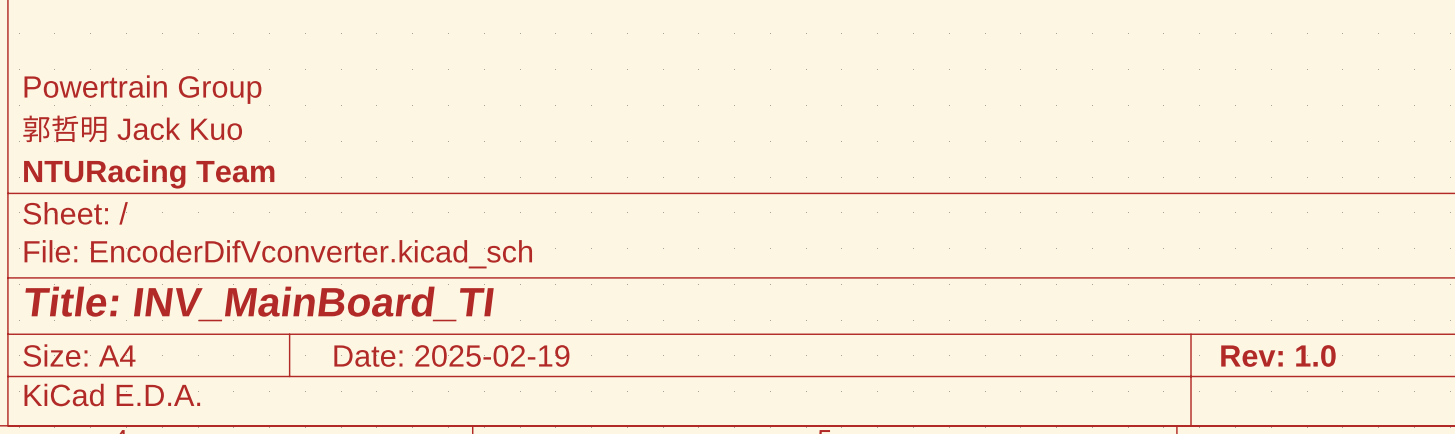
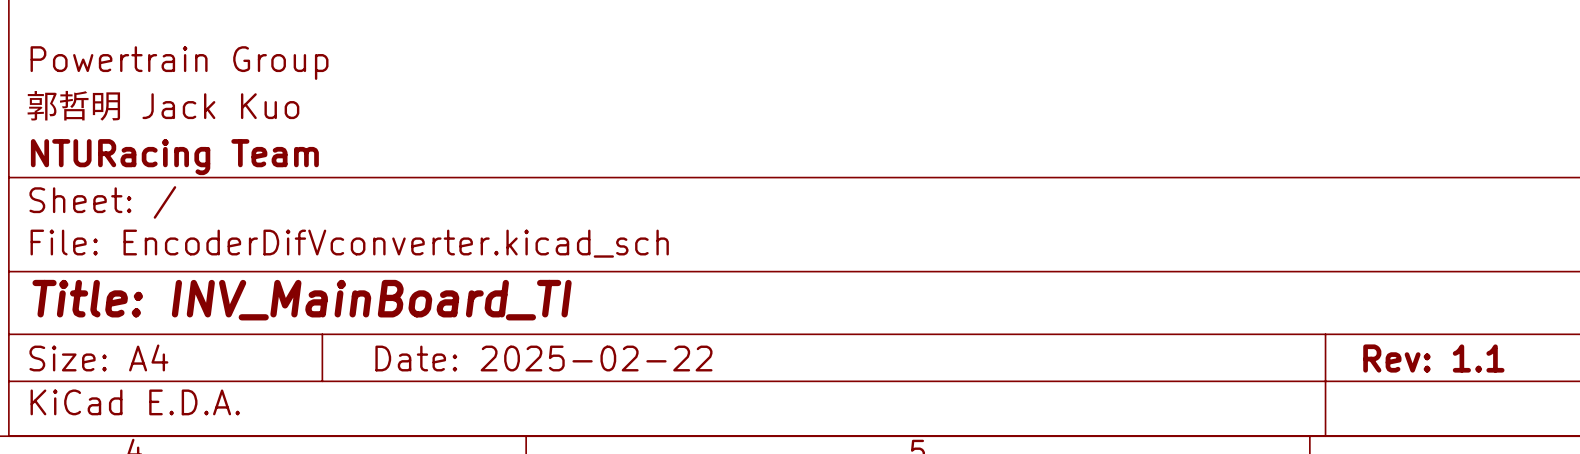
title block: Date: 2025-02-19 (451, 355) -> Date: 2025-02-22 (543, 358)
title block: Rev: 1.0 (1278, 355) -> Rev: 1.1 (1433, 358)

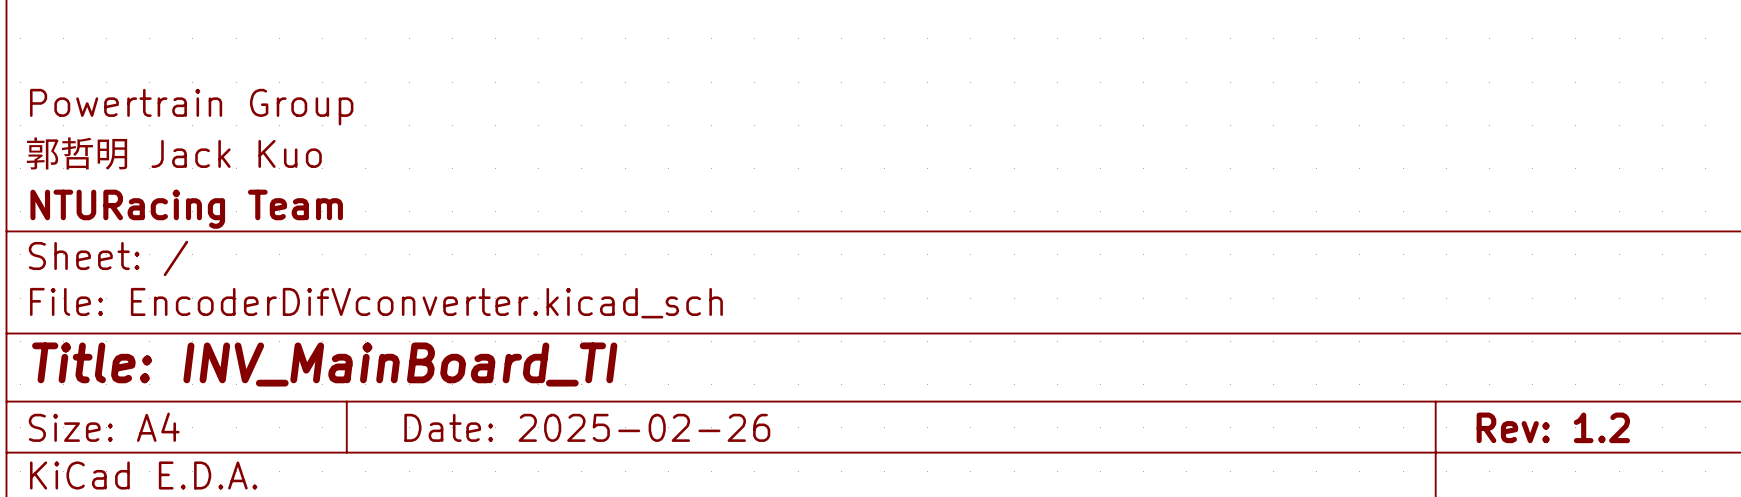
title block: Date: 2025-02-22 (543, 358) -> Date: 2025-02-26 (587, 427)
title block: Rev: 1.1 (1433, 358) -> Rev: 1.2 (1553, 427)

